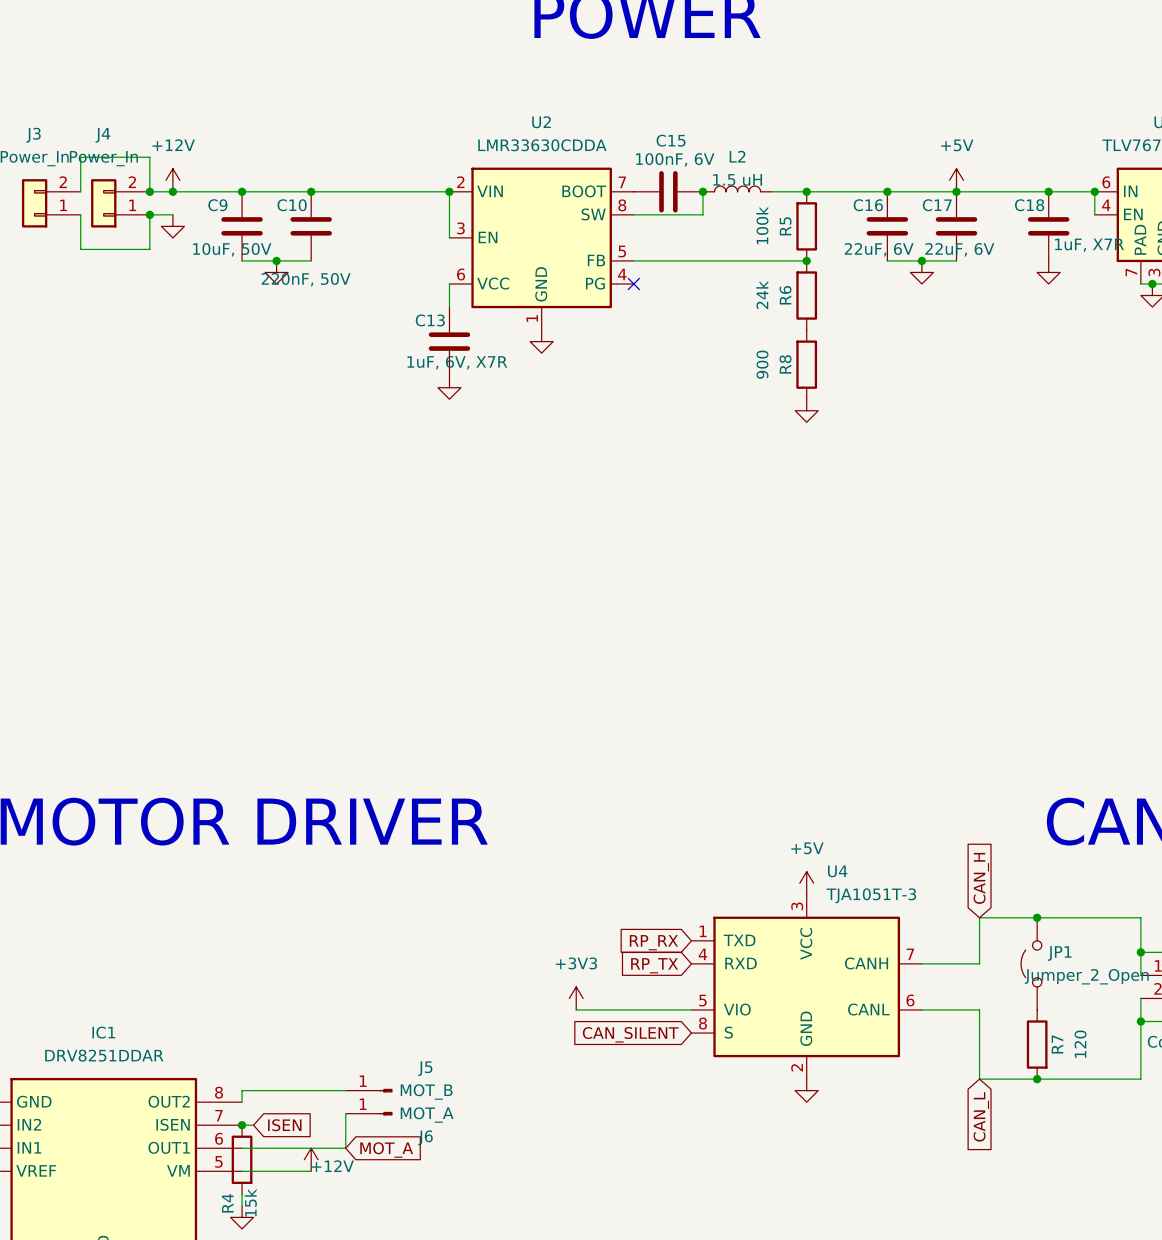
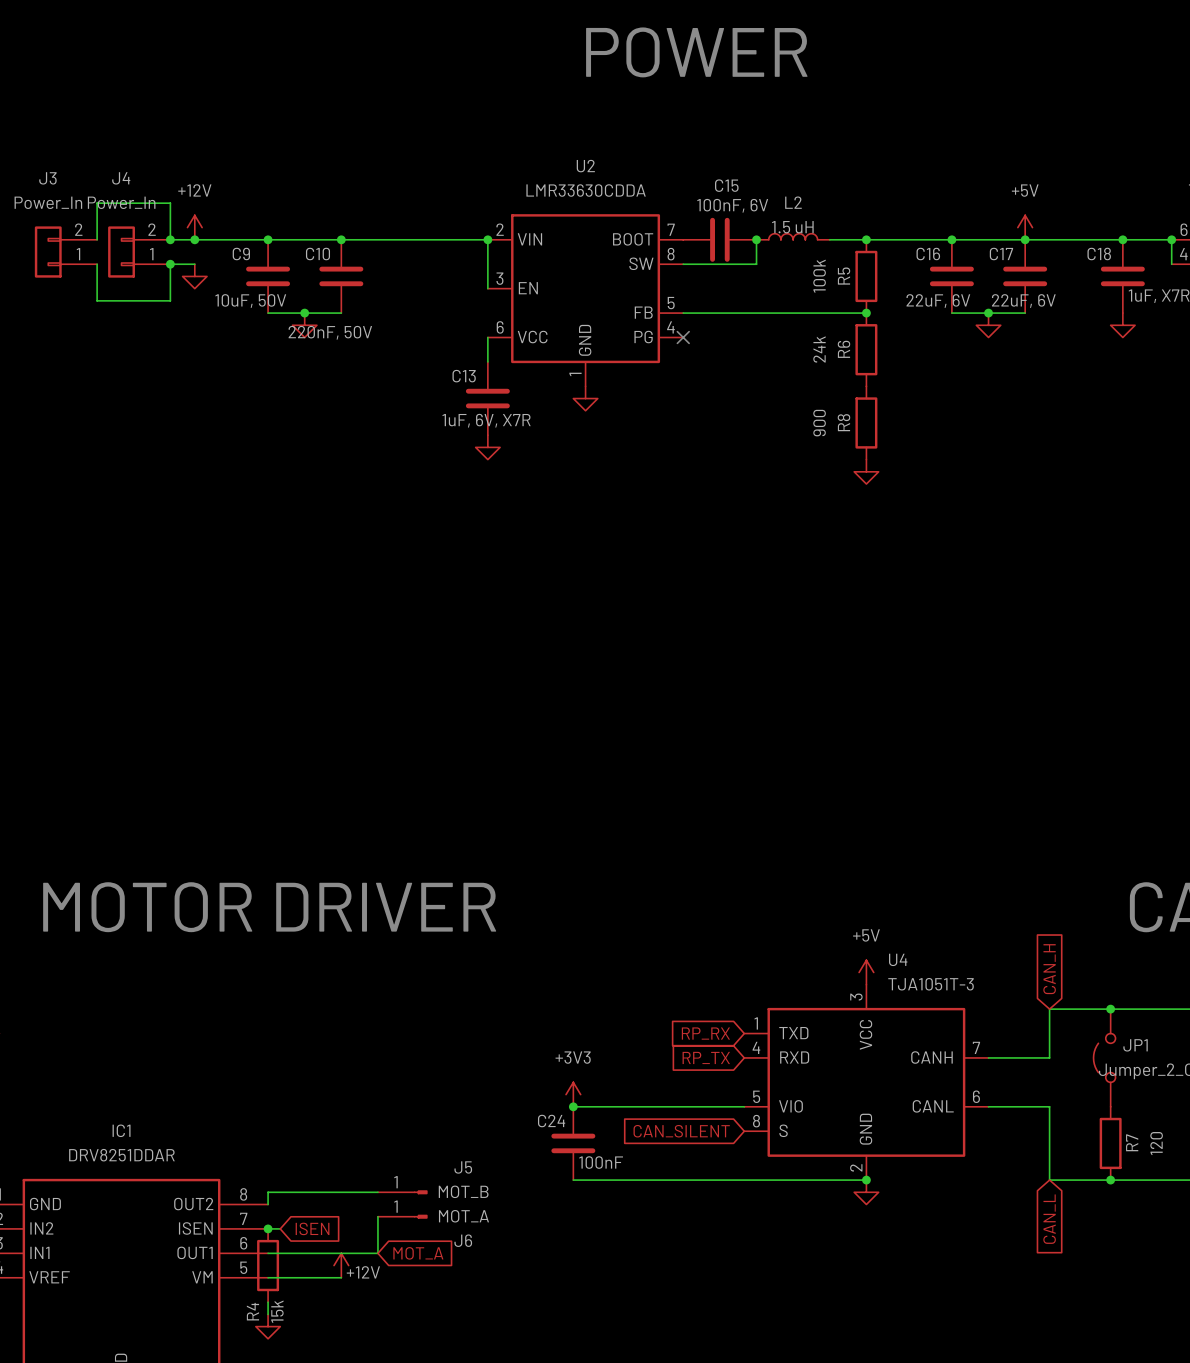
power symbol position: +3V3 (576, 998) -> +3V3 (573, 1094)
wire: none -> (573, 1106) (622, 1106)
junction: none -> (573, 1106)
C24: none -> 100nF (573, 1143)
wire: none -> (573, 1180) (866, 1180)
junction: none -> (866, 1180)

